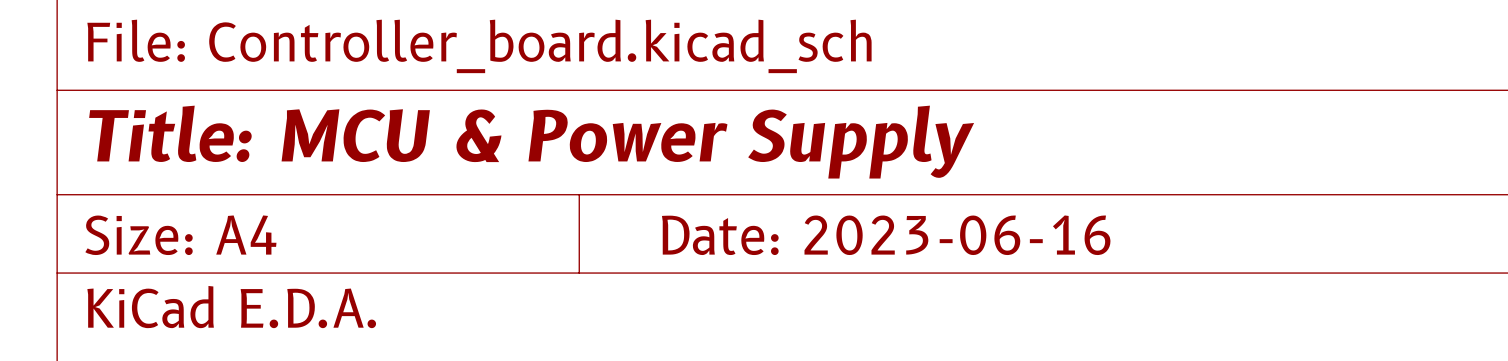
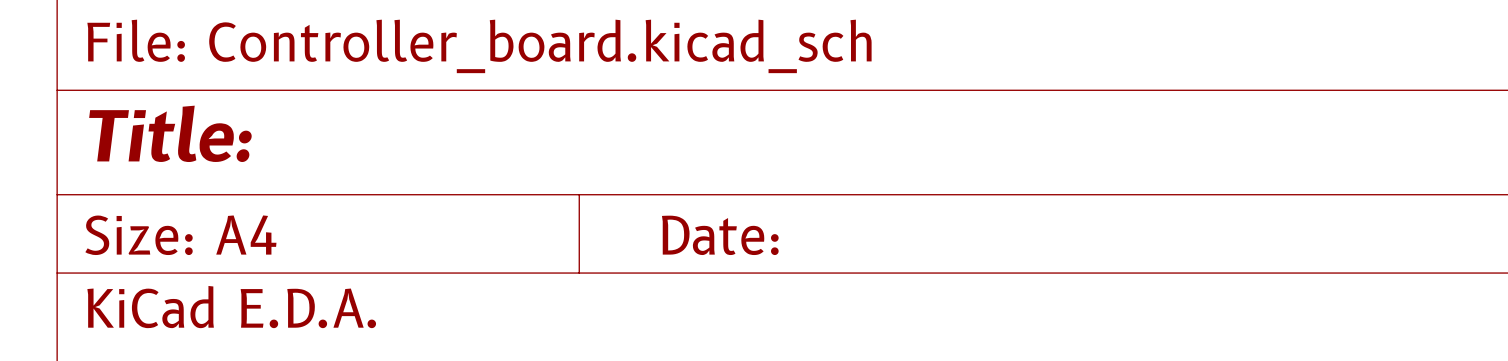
title block: Title: MCU & Power Supply (531, 142) -> Title: (170, 133)
title block: Date: 2023-06-16 (886, 235) -> Date: (720, 235)

